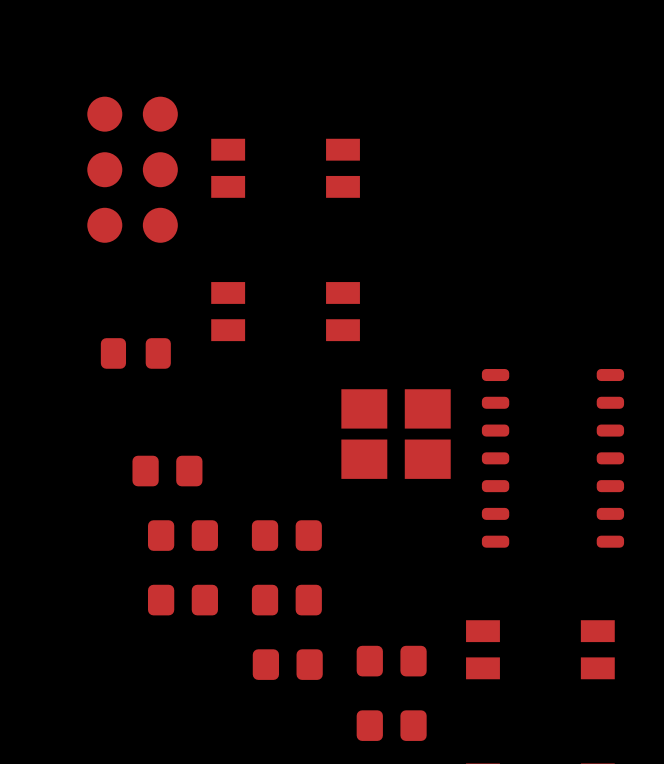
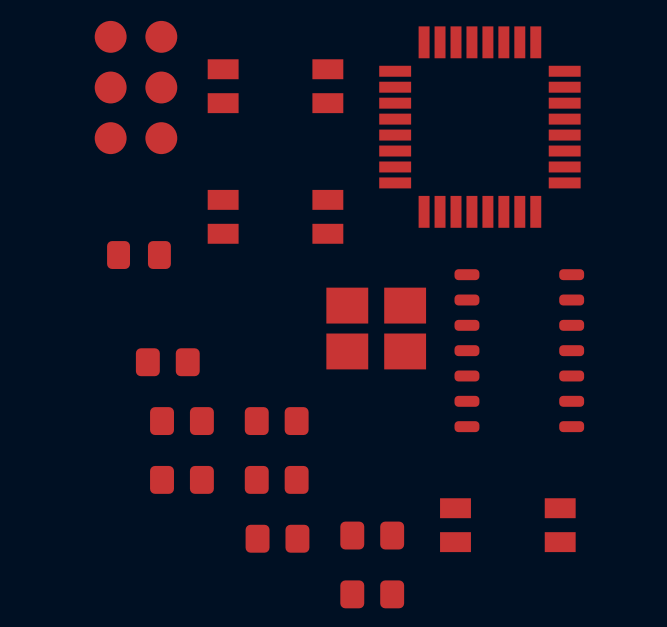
part: none -> (479, 127)

